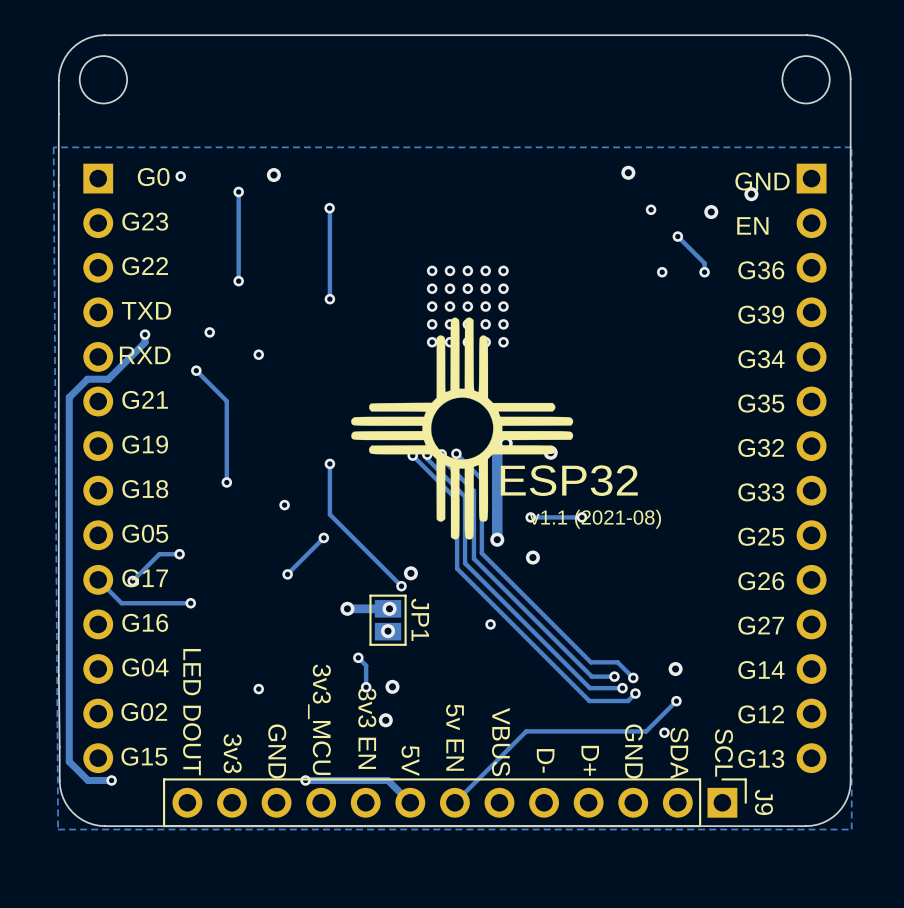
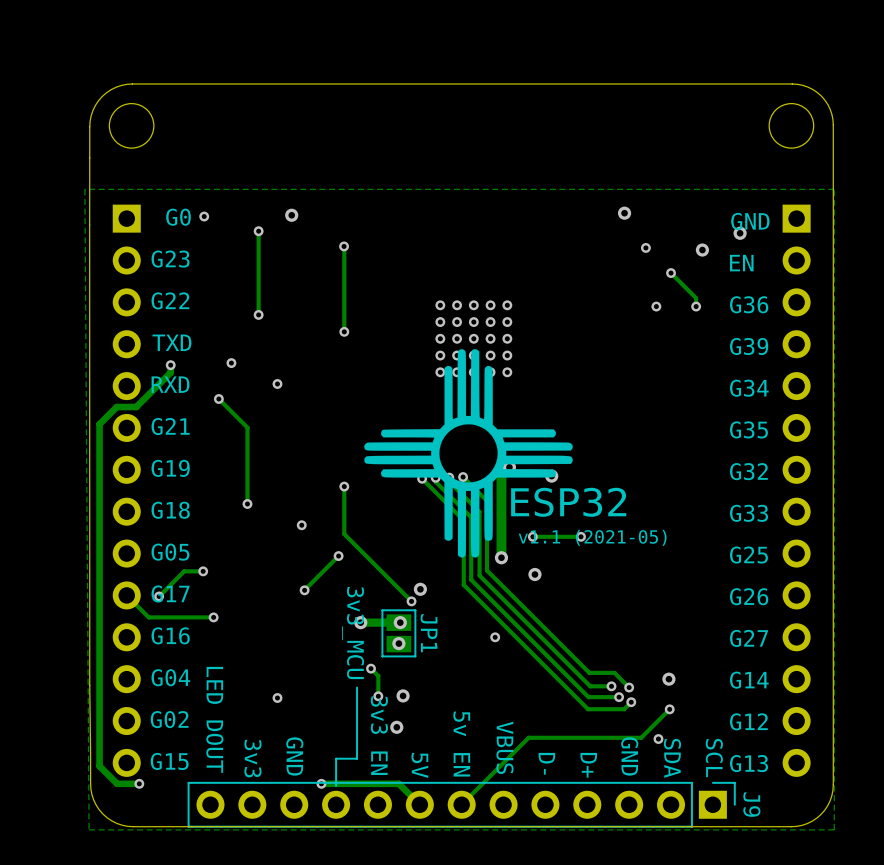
text: v1.1 (2021-08) (595, 519) -> v1.1 (2021-05) (592, 537)
line: none -> (357, 687) (357, 758) (336, 758) (336, 785)
text position: 3v3_MCU (319, 719) -> 3v3_MCU (353, 633)

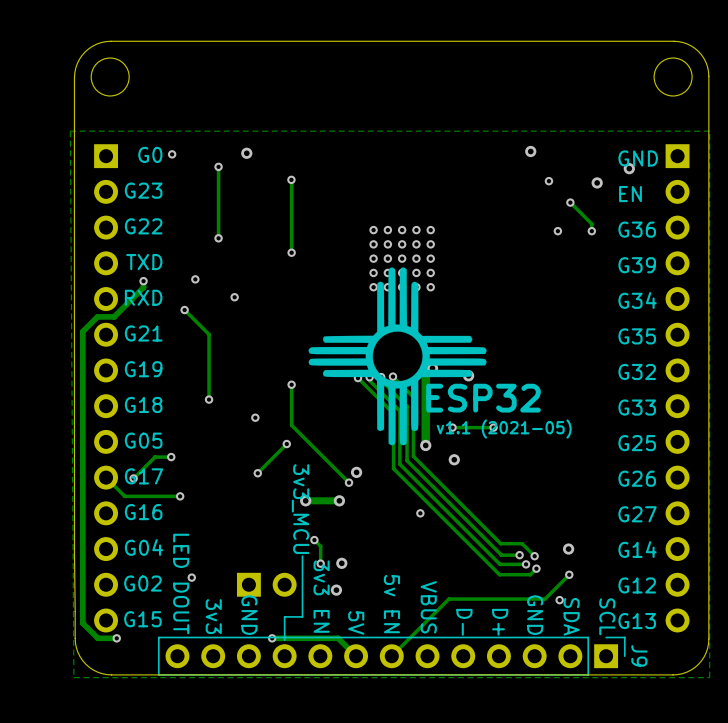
JP1: (398, 633) -> none
via: (398, 643) -> none
via position: (277, 698) -> (191, 577)
part: none -> (266, 584)

